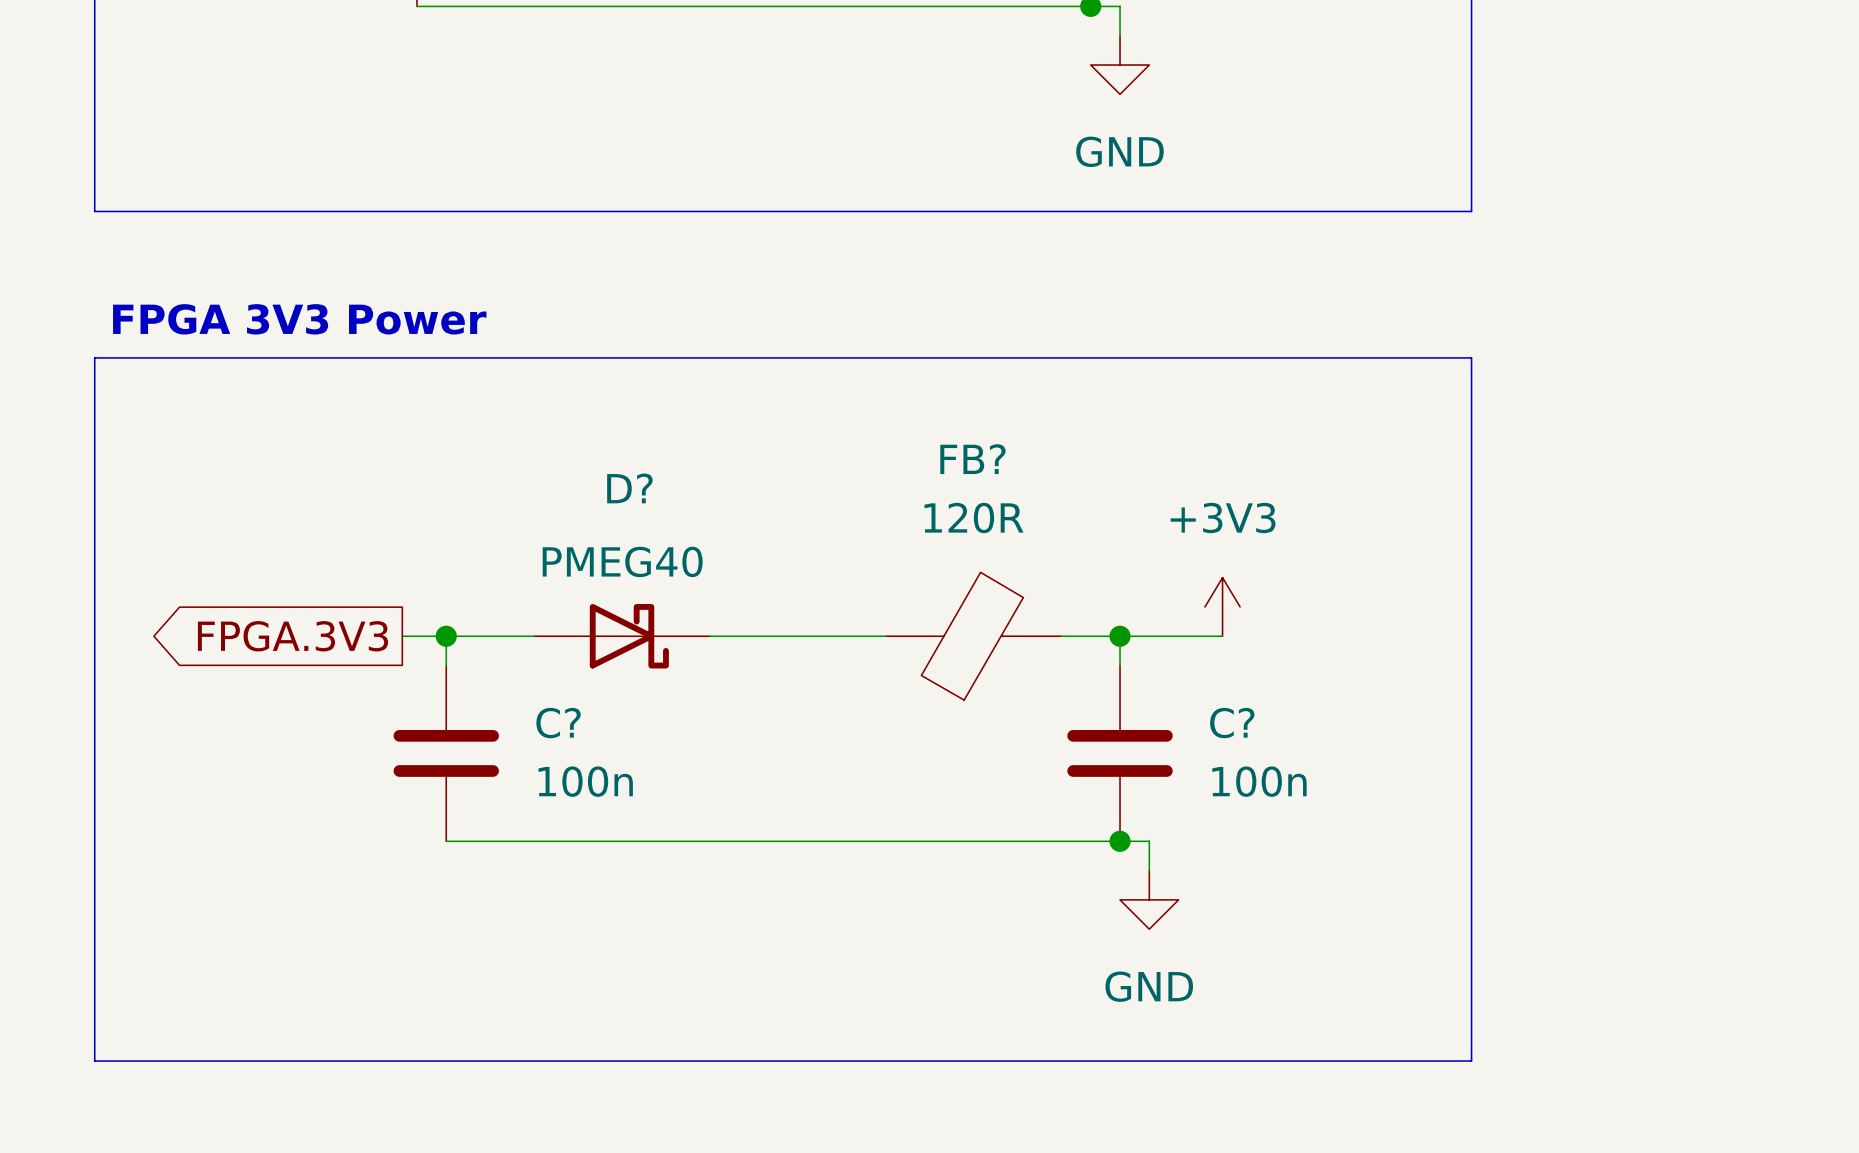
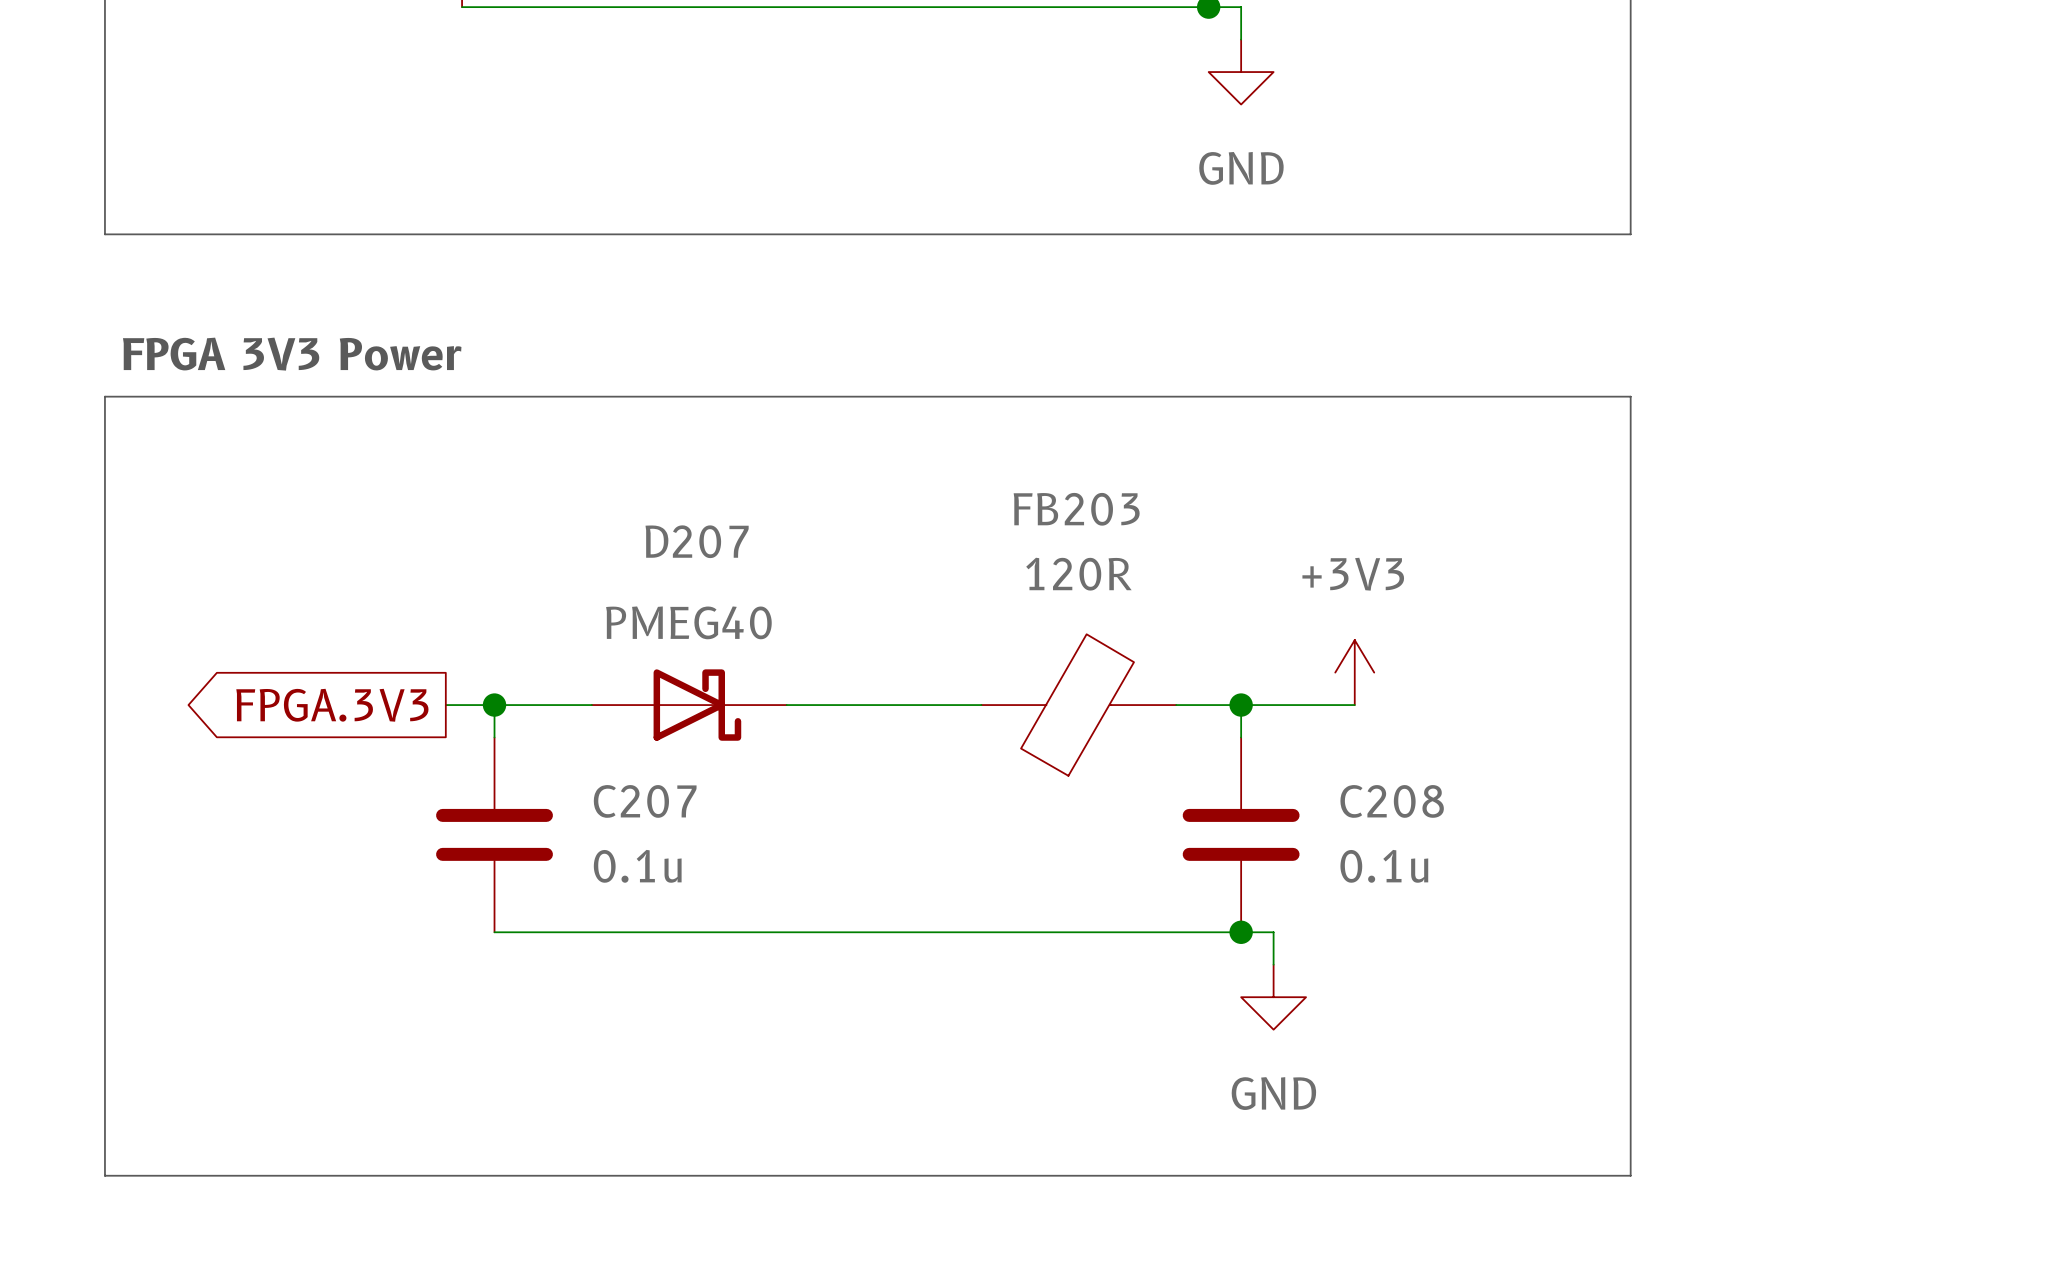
FB? name: FB? (972, 459) -> FB203 (1076, 509)
D? name: D? (629, 488) -> D207 (697, 541)
C? name: C? (558, 723) -> C207 (645, 801)
C? name: C? (1232, 723) -> C208 (1392, 801)
C? value: 100n (585, 781) -> 0.1u (637, 866)
C? value: 100n (1259, 781) -> 0.1u (1384, 866)

